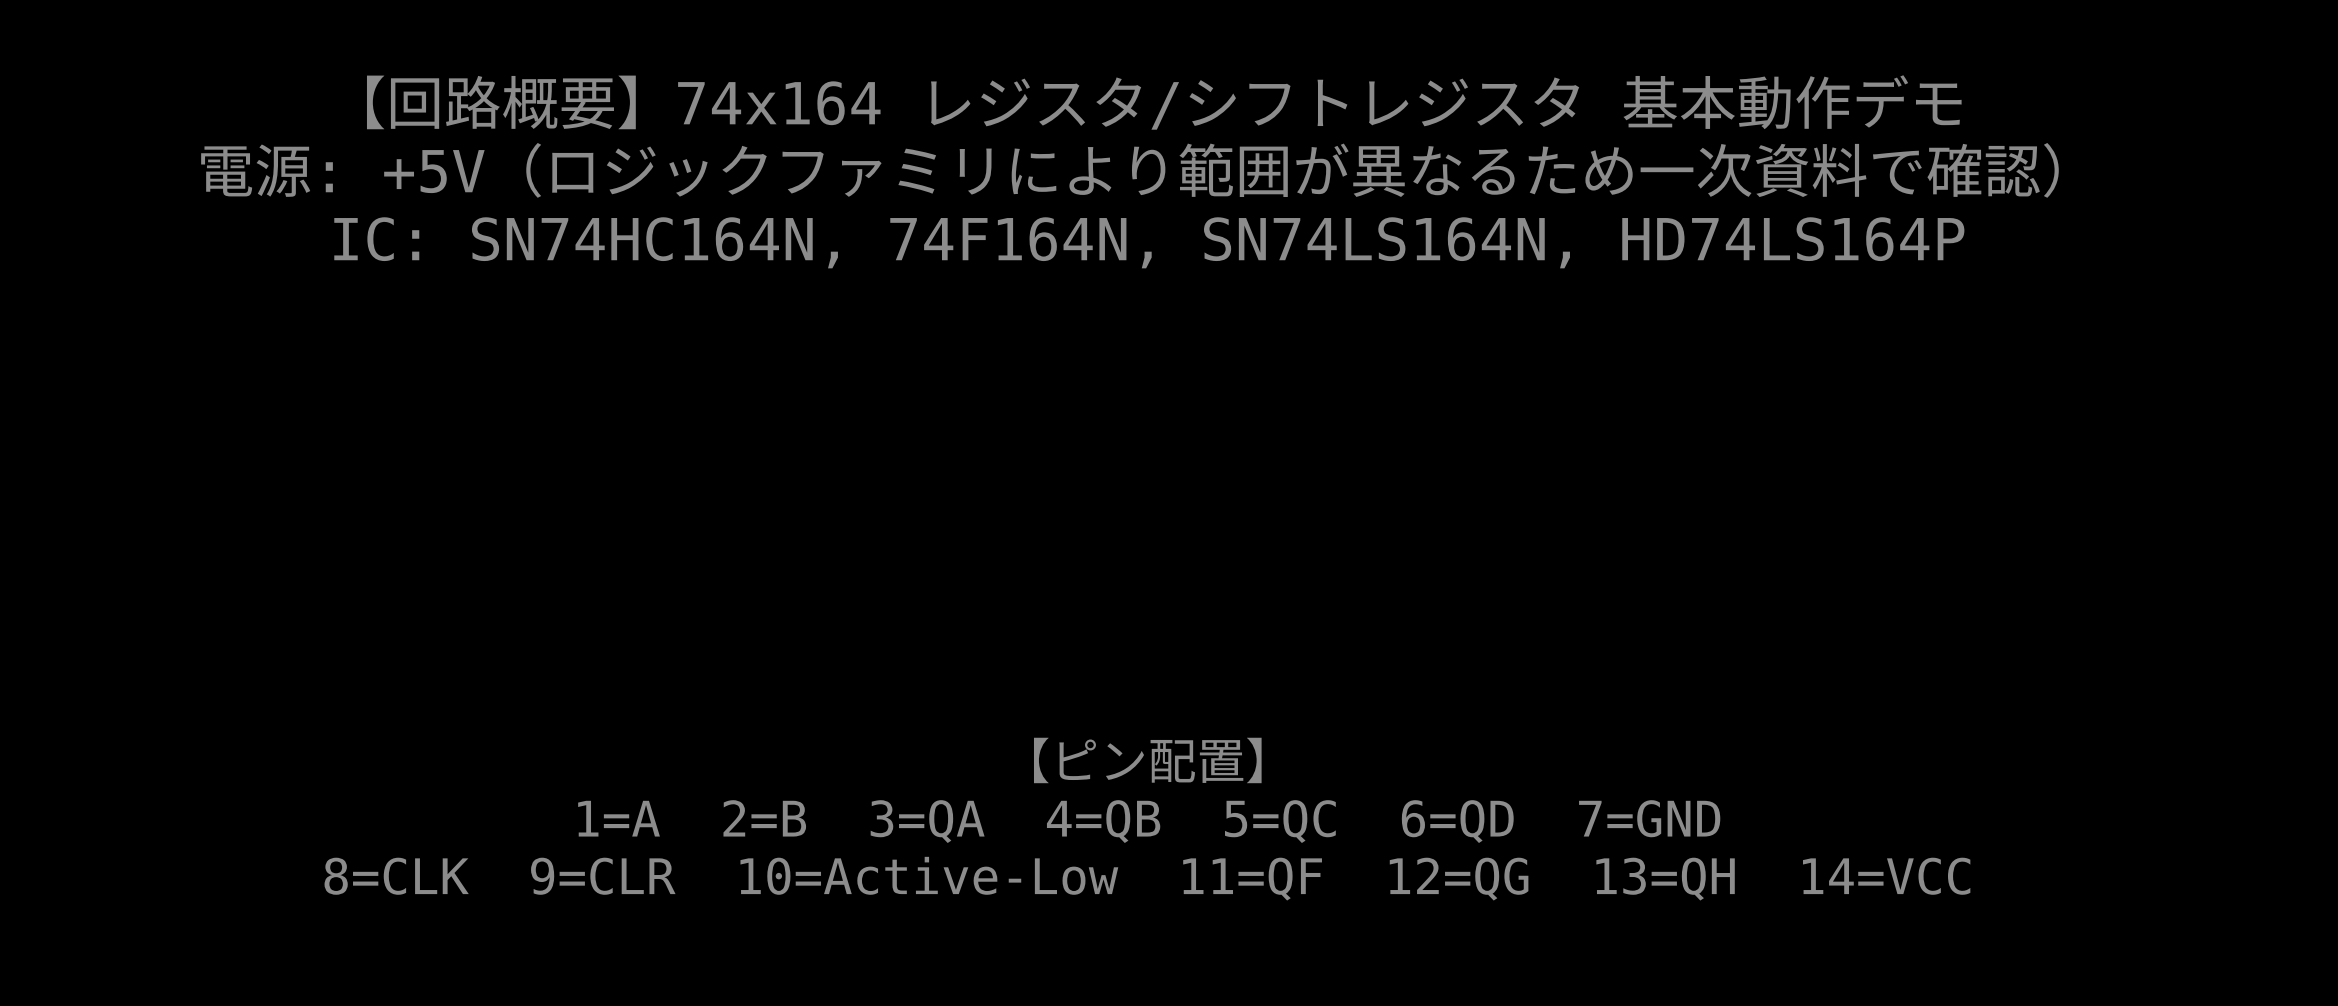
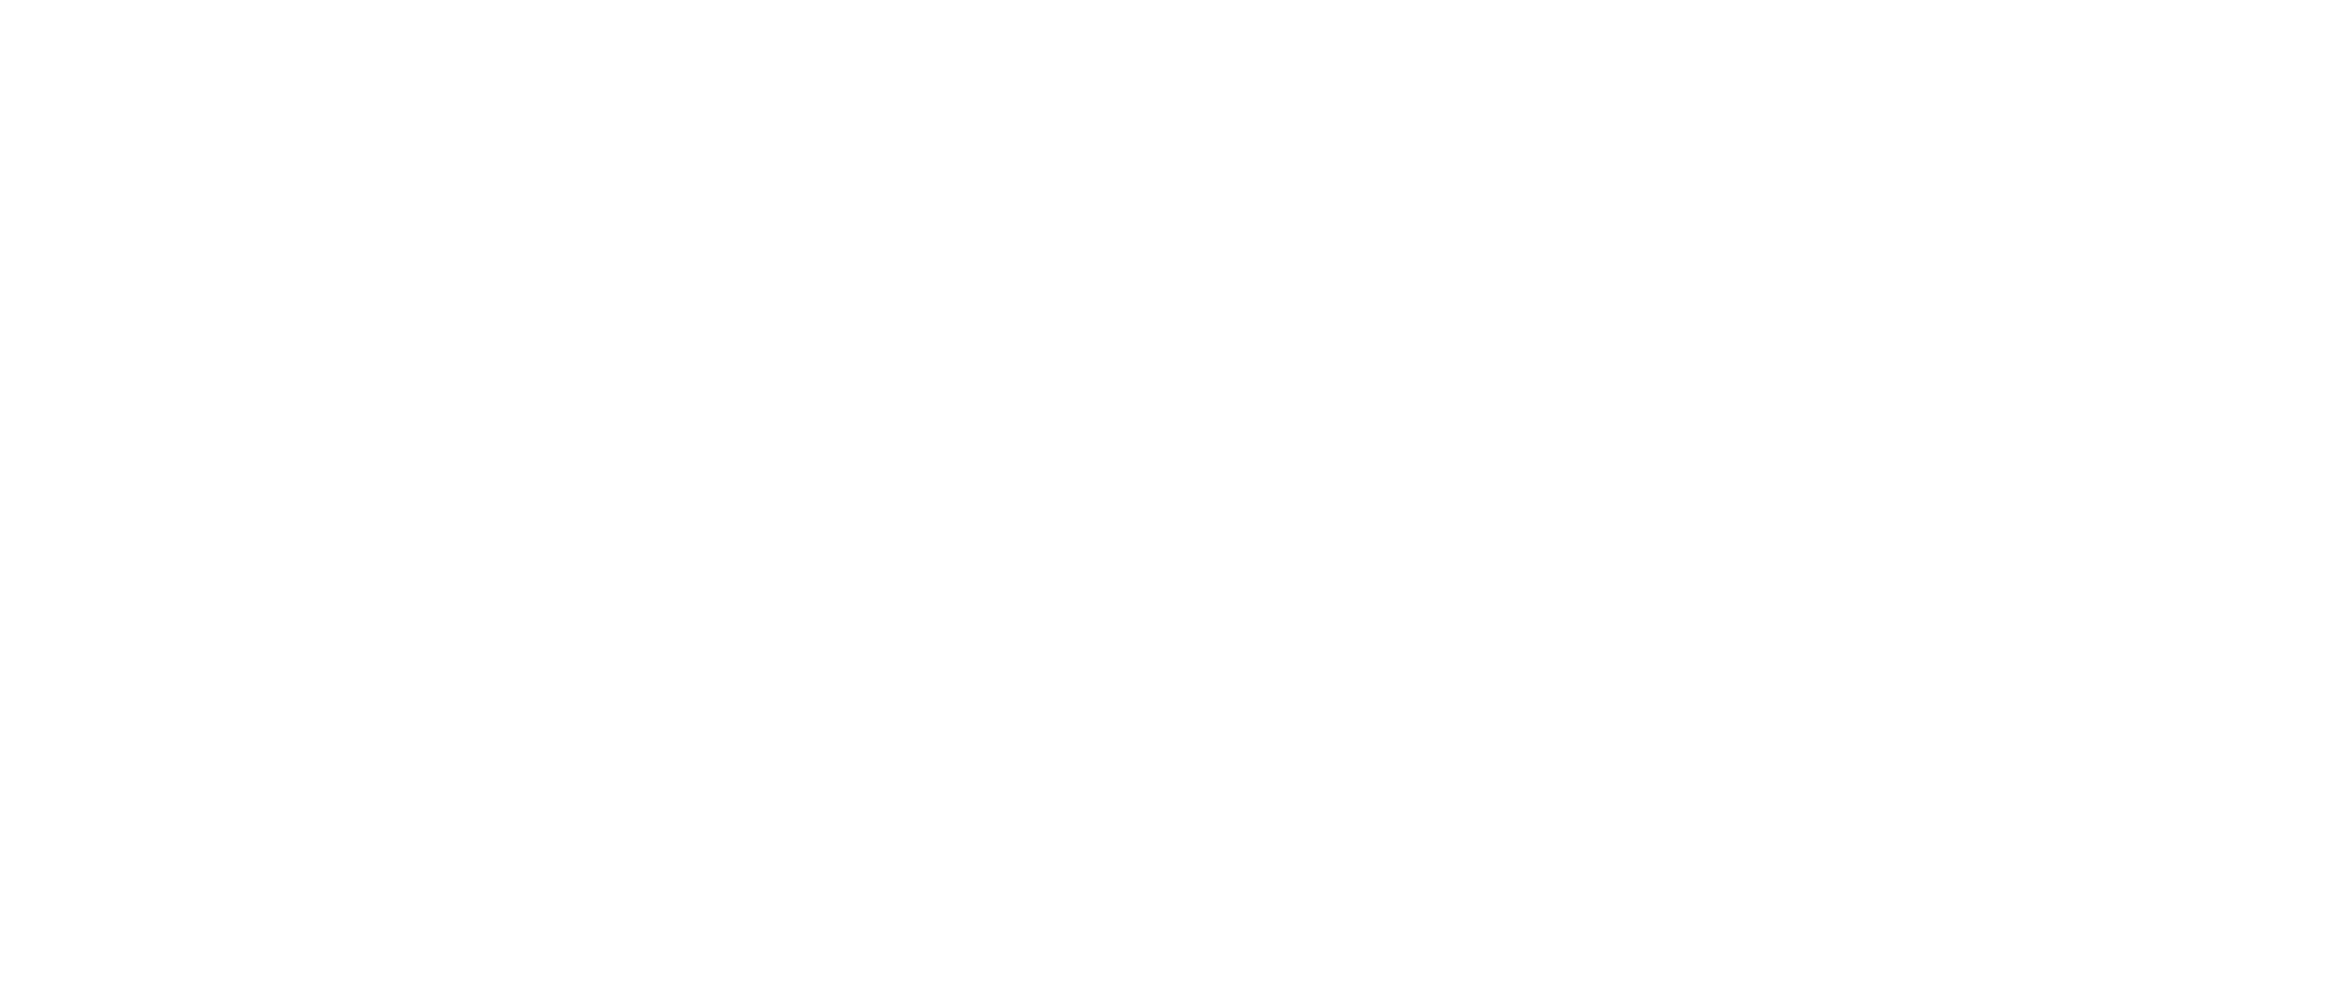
text: 【回路概要】74x164 レジスタ/シフトレジスタ 基本動作デモ (1164, 102) -> none
text: 電源: +5V（ロジックファミリにより範囲が異なるため一次資料で確認） (1129, 170) -> none
text: IC: SN74HC164N, 74F164N, SN74LS164N, HD74LS164P (1149, 242) -> none
text: 【ピン配置】 (1147, 760) -> none
text: 1=A 2=B 3=QA 4=QB 5=QC 6=QD 7=GND (1149, 821) -> none
text: 8=CLK 9=CLR 10=Active-Low 11=QF 12=QG 13=QH 14=VCC (1147, 878) -> none

